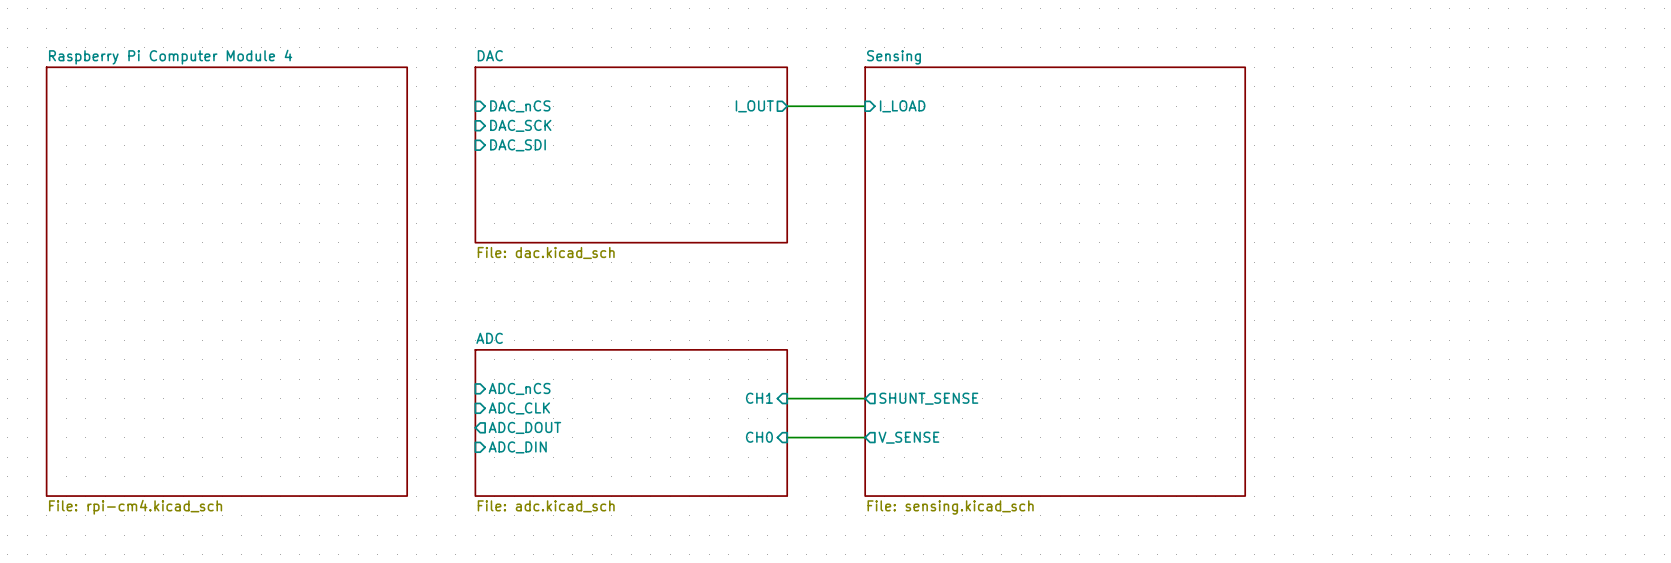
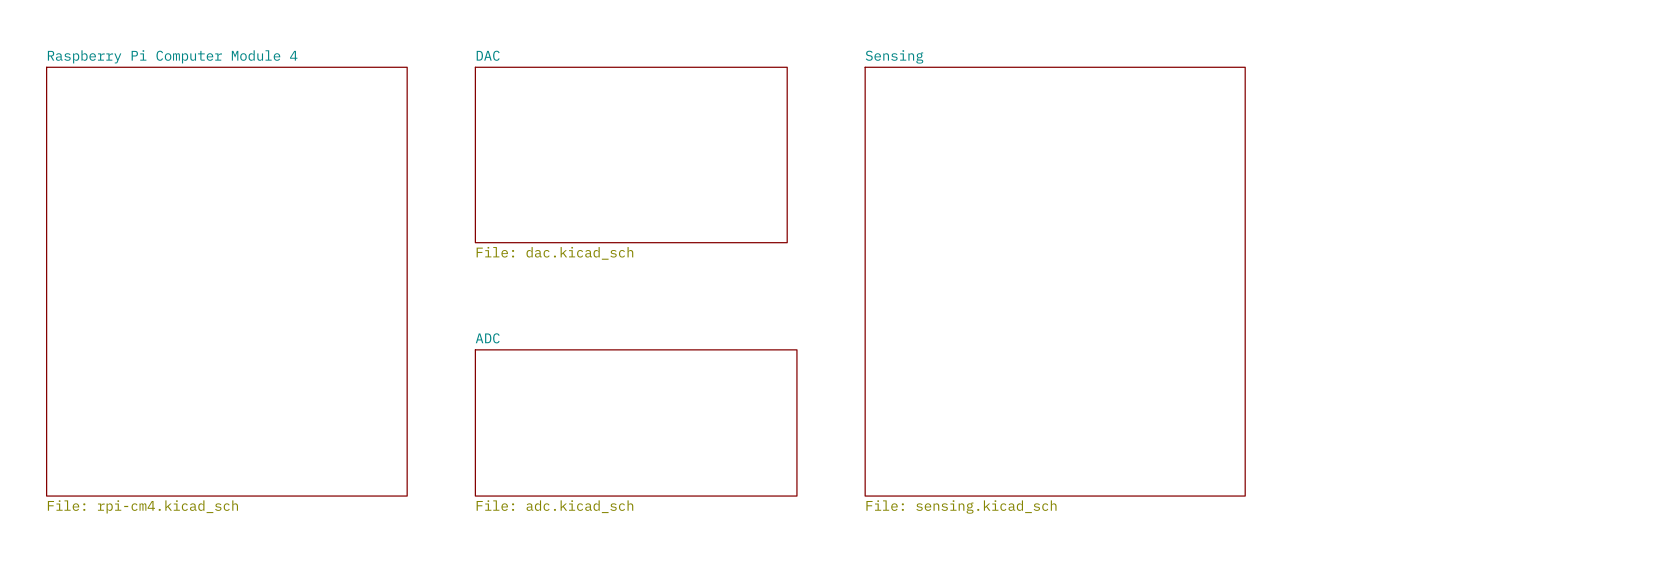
sheet pin: DAC_nCS (520, 106) -> none
sheet pin: I_OUT (754, 106) -> none
wire: (787, 106) (865, 106) -> none
sheet pin: I_LOAD (902, 106) -> none
sheet pin: DAC_SCK (520, 125) -> none
sheet pin: DAC_SDI (517, 145) -> none
sheet ADC shape: [474, 349, 788, 497] -> [474, 349, 798, 497]
sheet pin: ADC_nCS (519, 388) -> none
sheet pin: CH1 (759, 398) -> none
wire: (787, 398) (865, 398) -> none
sheet pin: SHUNT_SENSE (928, 398) -> none
sheet pin: ADC_CLK (519, 408) -> none
sheet pin: ADC_DOUT (524, 427) -> none
sheet pin: CH0 (759, 437) -> none
wire: (787, 437) (865, 437) -> none
sheet pin: V_SENSE (908, 437) -> none
sheet pin: ADC_DIN (517, 447) -> none

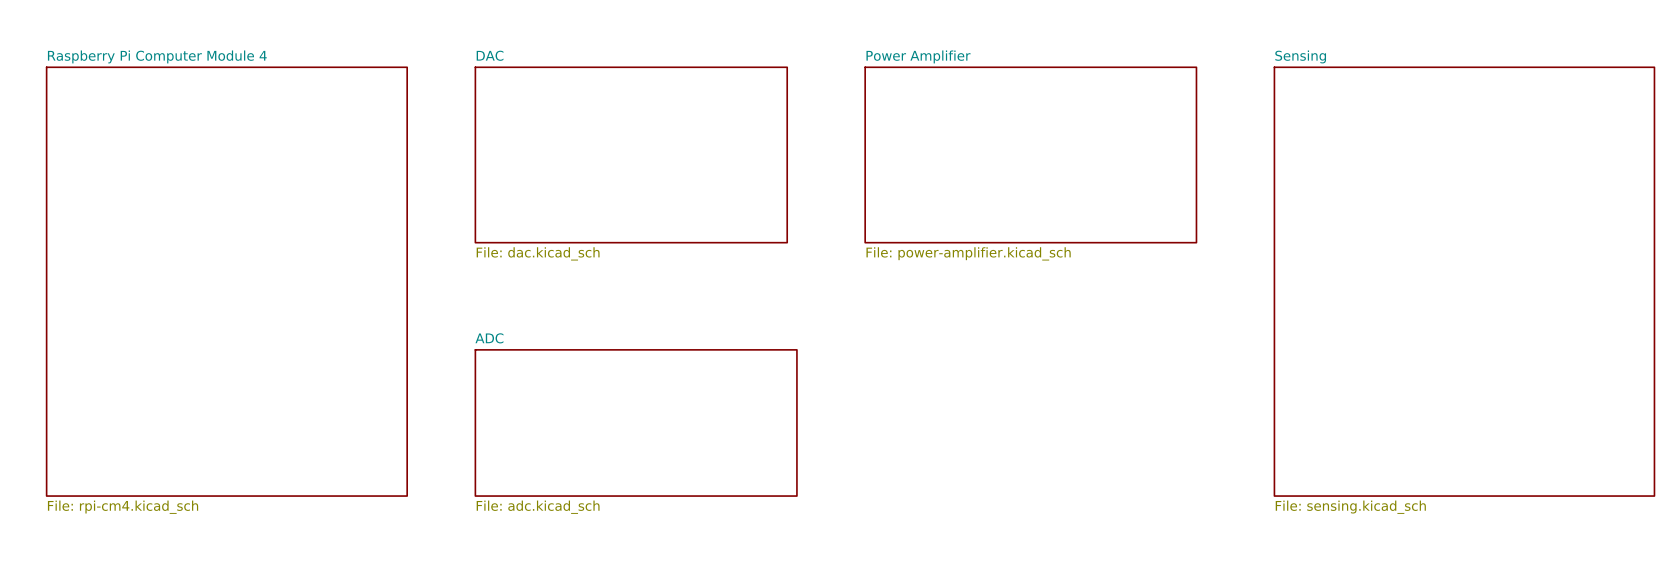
sheet Power Amplifier: none -> File: power-amplifier.kicad_sch (1030, 154)
sheet Sensing: File: sensing.kicad_sch (1055, 281) -> none
sheet Sensing: none -> File: sensing.kicad_sch (1464, 281)

